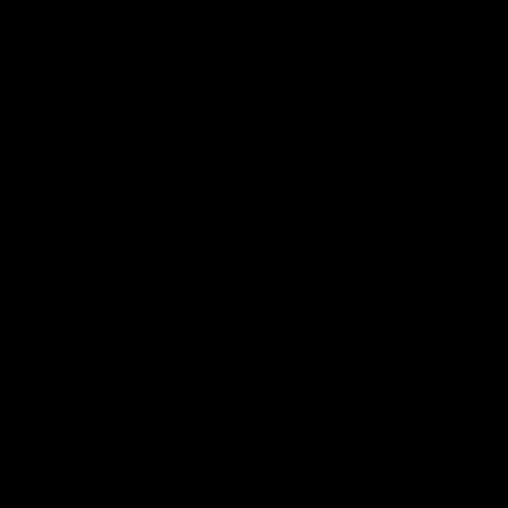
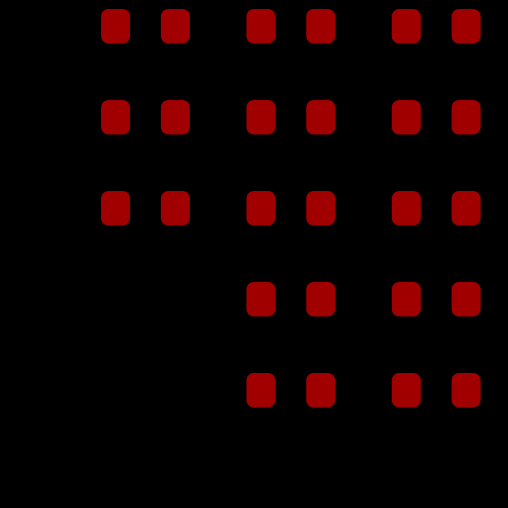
part: none -> (145, 26)
part: none -> (290, 26)
part: none -> (436, 26)
part: none -> (145, 117)
part: none -> (290, 117)
part: none -> (436, 117)
part: none -> (145, 208)
part: none -> (290, 208)
part: none -> (436, 208)
part: none -> (290, 299)
part: none -> (436, 299)
part: none -> (290, 390)
part: none -> (436, 390)

